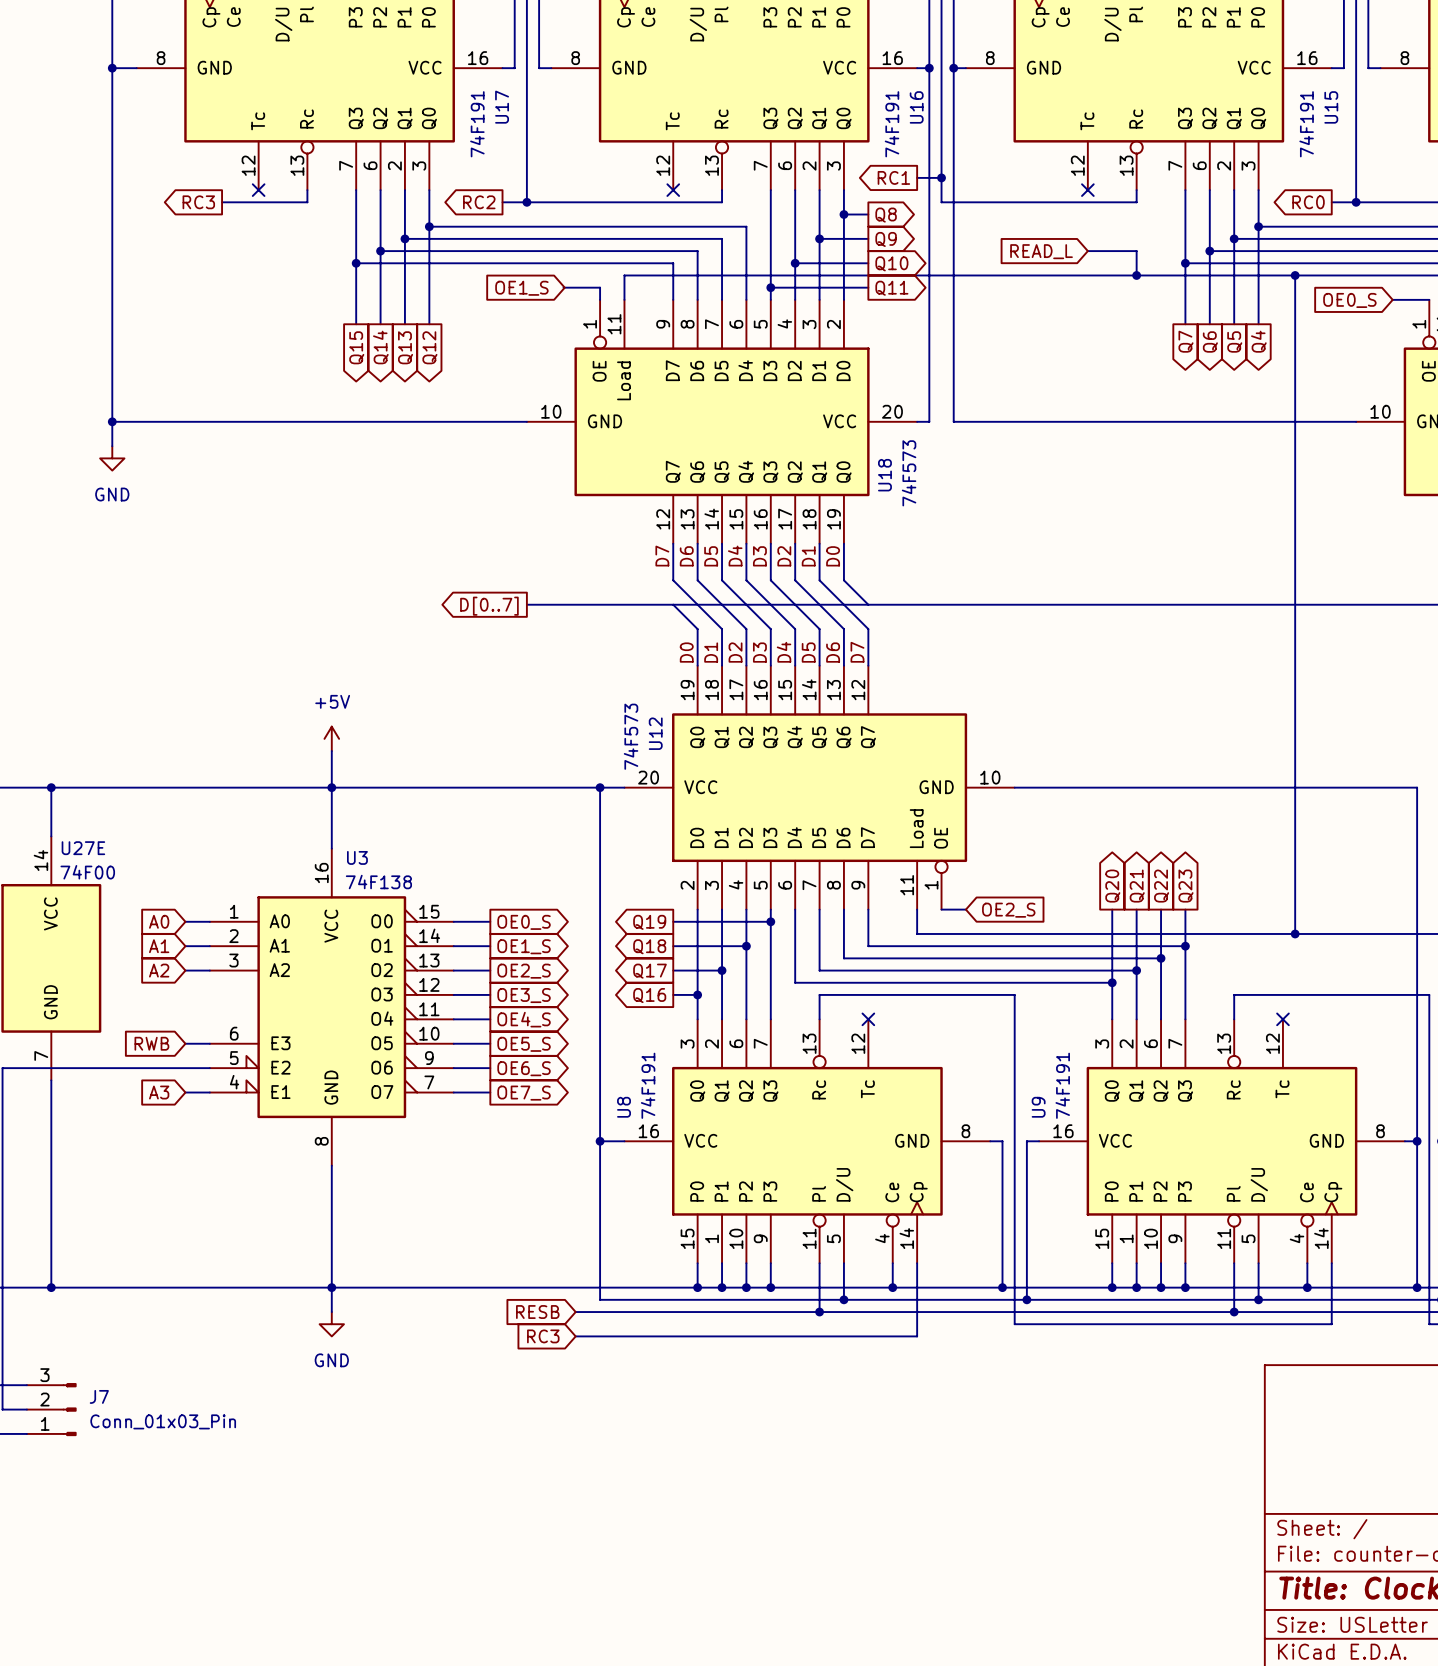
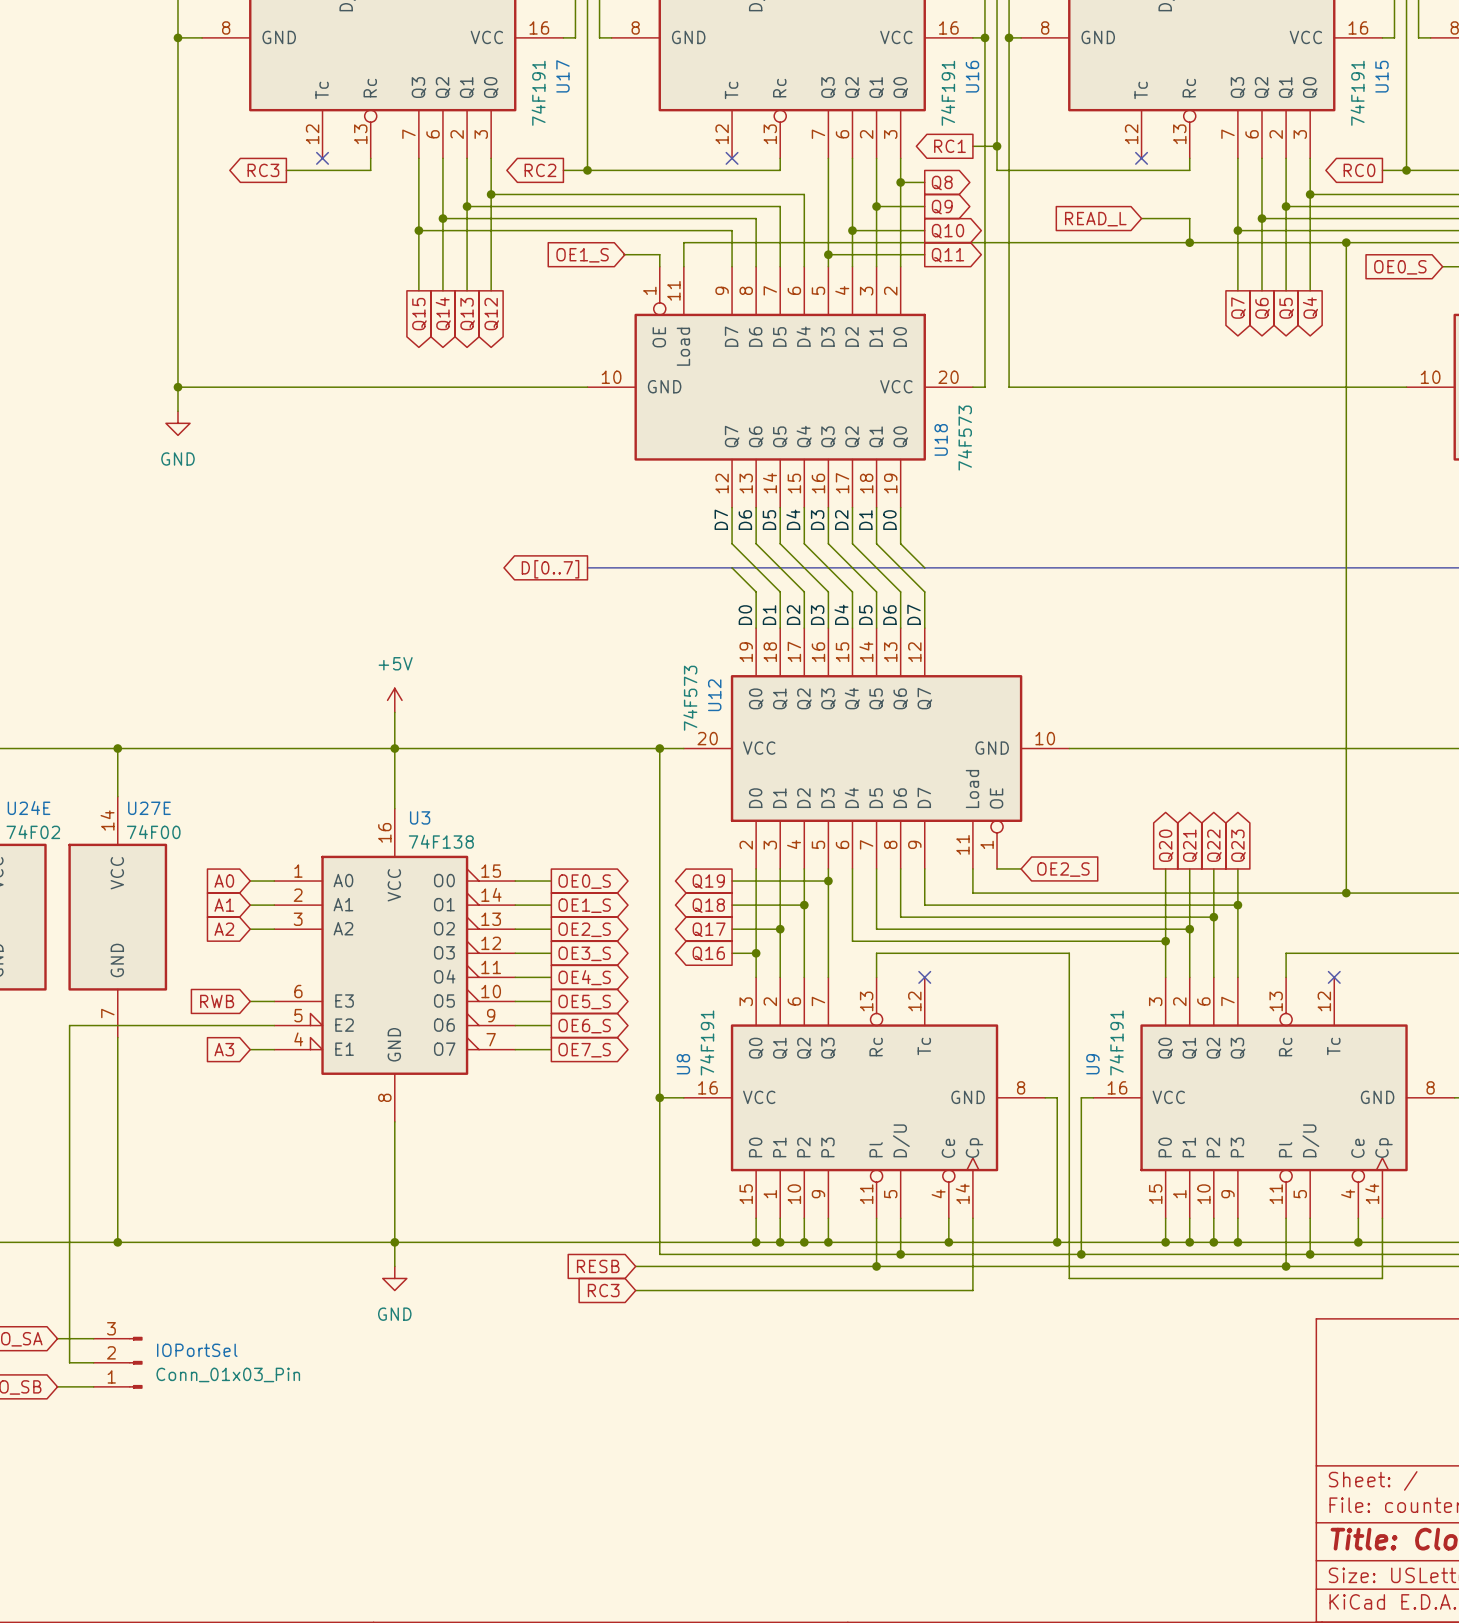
J7 name: J7 (99, 1396) -> IOPortSel (197, 1350)

